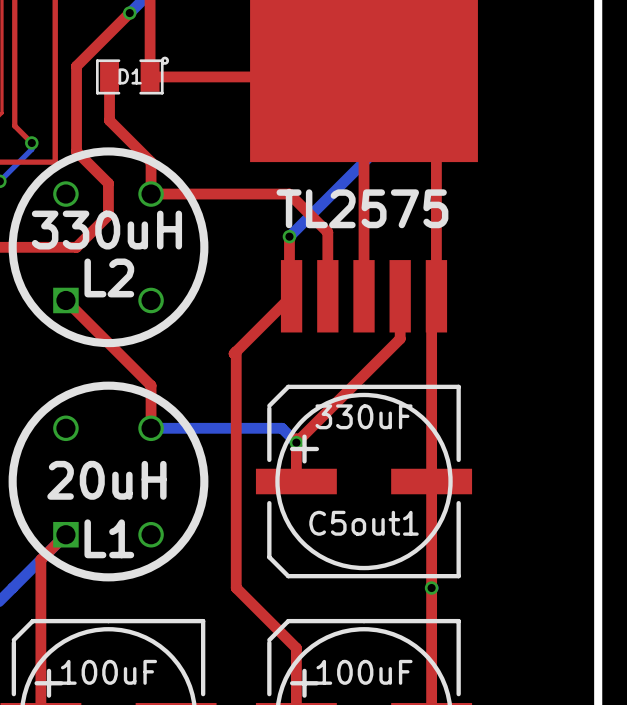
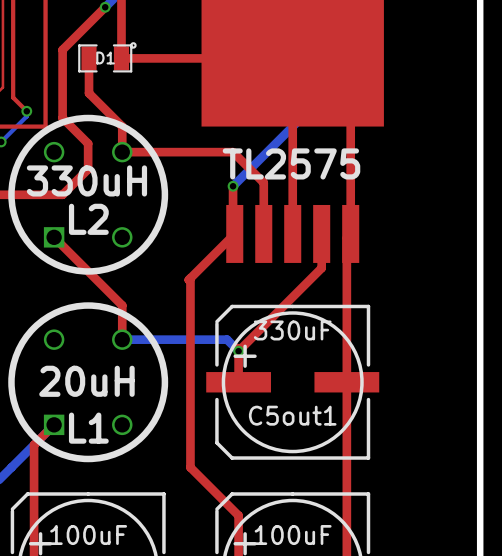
via: (431, 588) -> none

